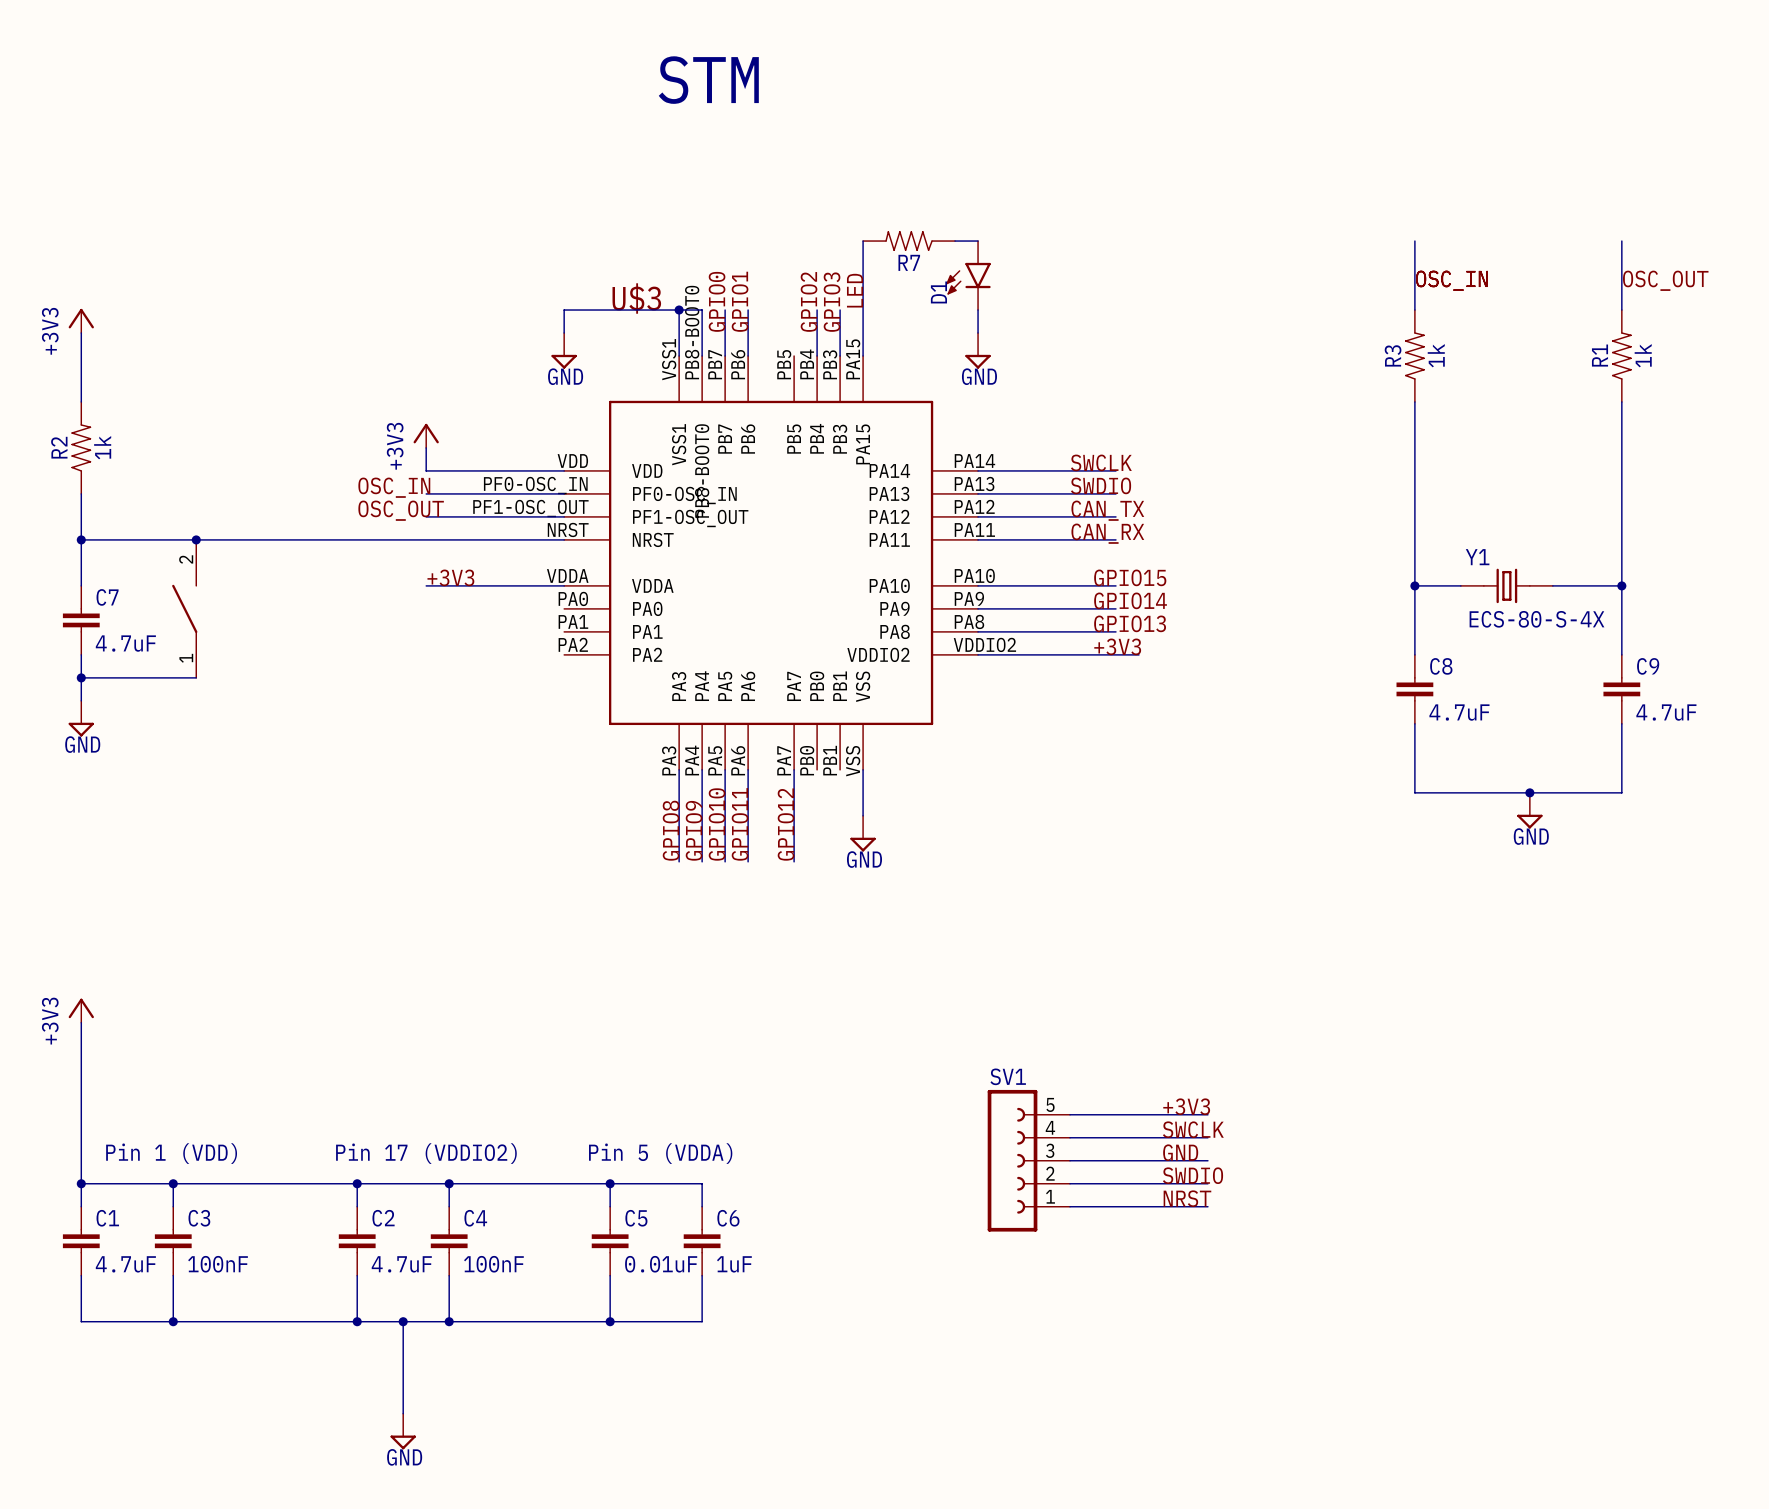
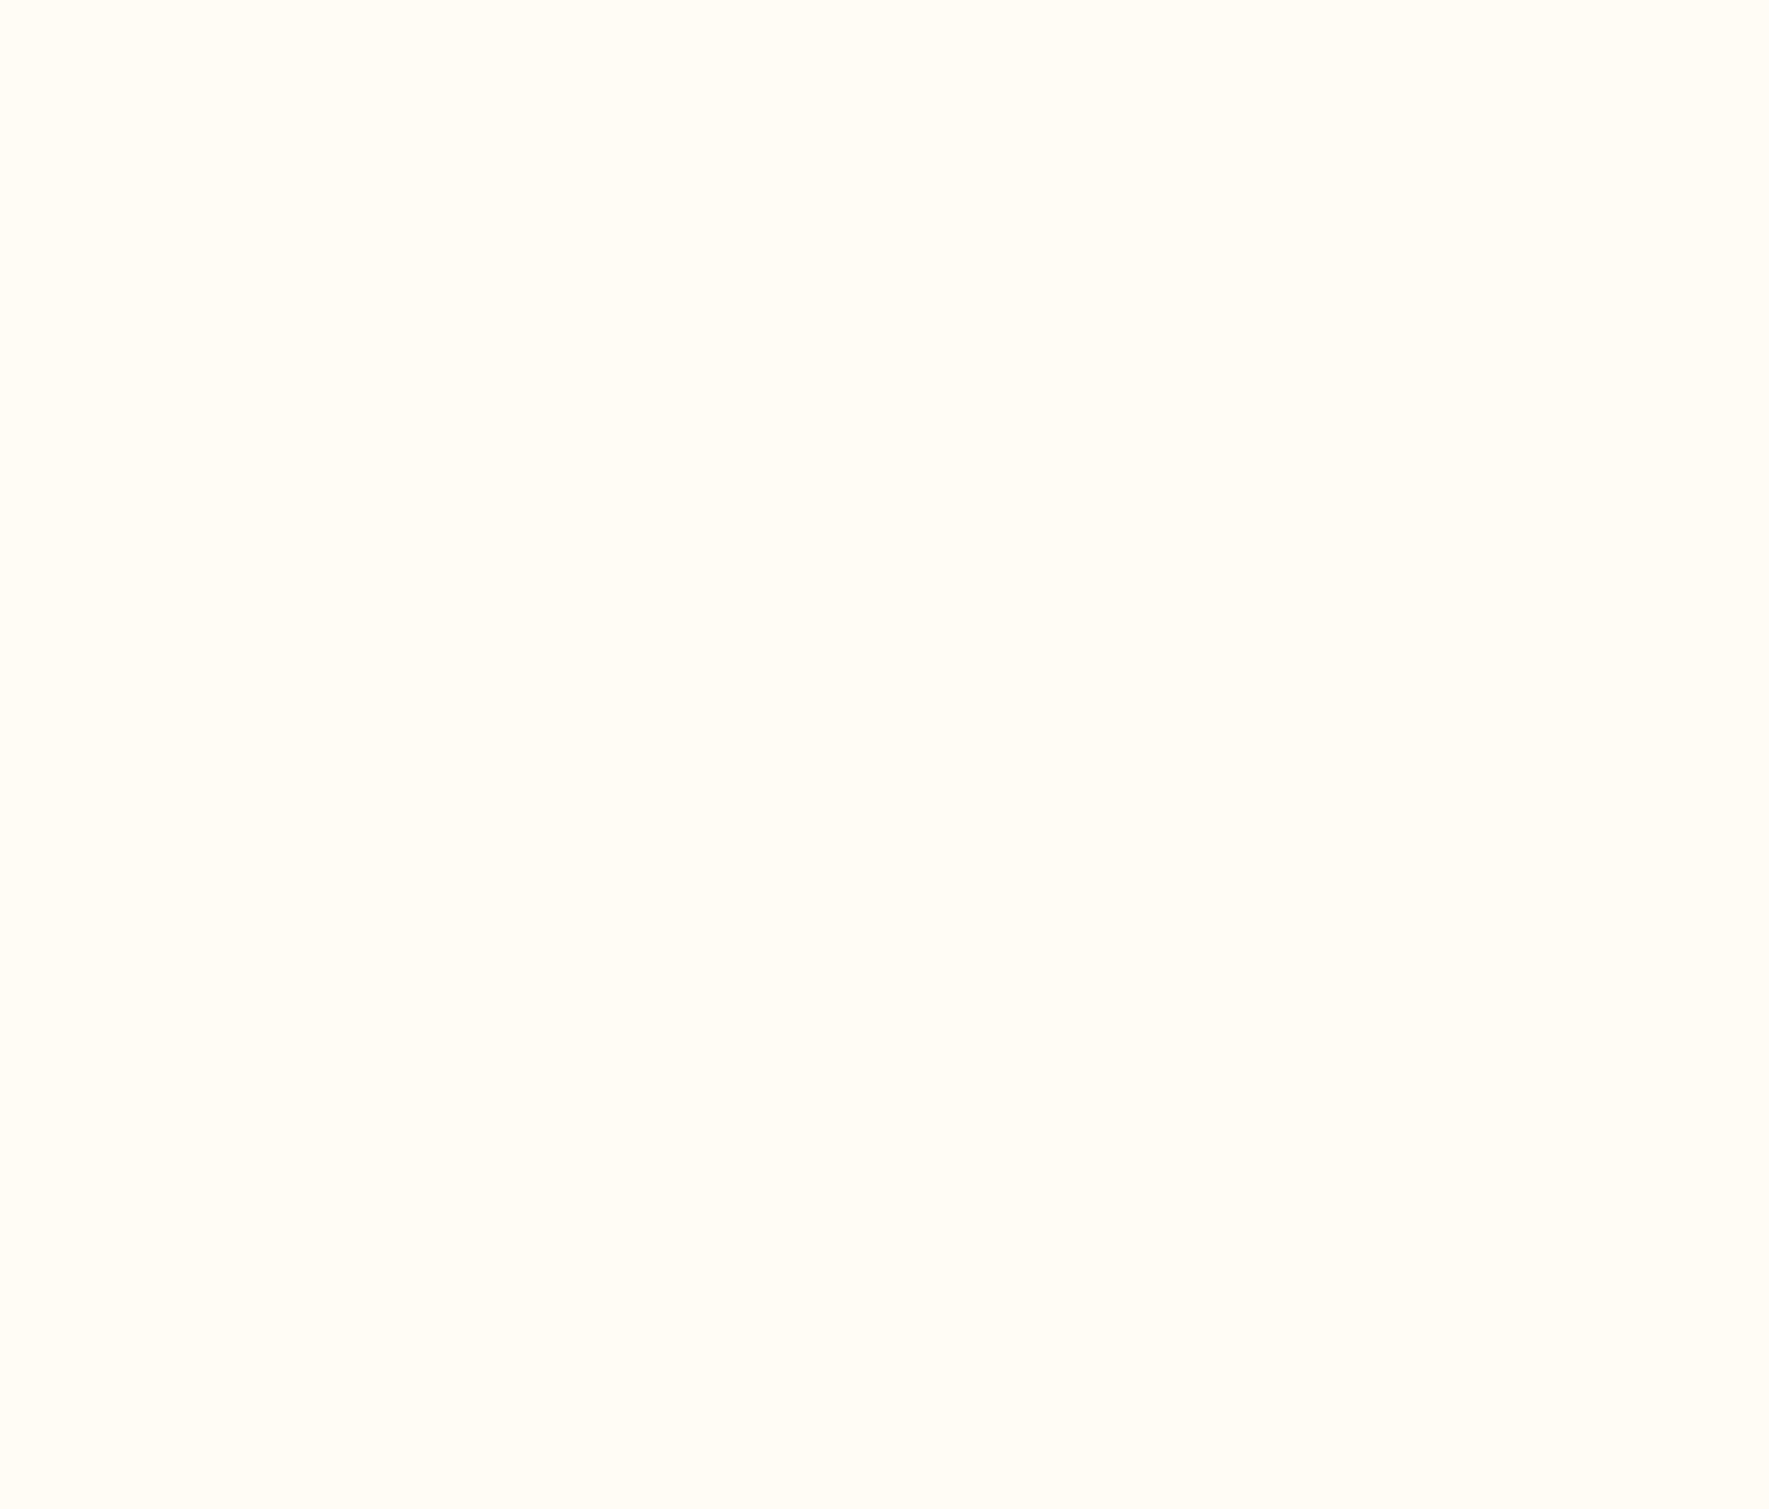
text: STM (708, 80) -> none
wire: (863, 241) (863, 355) -> none
R7: (909, 241) -> none
wire: (955, 241) (978, 241) -> none
wire: (1414, 241) (1414, 310) -> none
wire: (1621, 241) (1621, 310) -> none
D1: (968, 275) -> none
label: OSC_IN (1452, 280) -> none
label: OSC_OUT (1665, 280) -> none
label: LED (855, 290) -> none
label: GPIO0 (717, 301) -> none
label: GPIO1 (740, 301) -> none
label: GPIO2 (809, 301) -> none
label: GPIO3 (832, 302) -> none
wire: (679, 310) (679, 355) -> none
junction: (679, 310) -> none
wire: (725, 310) (725, 355) -> none
wire: (748, 310) (748, 355) -> none
wire: (817, 310) (817, 355) -> none
wire: (840, 310) (840, 355) -> none
wire: (978, 310) (978, 333) -> none
power symbol: +3V3 (81, 320) -> none
wire: (81, 333) (81, 401) -> none
wire: (564, 333) (564, 310) (702, 310) (702, 355) -> none
power symbol: GND (564, 350) -> none
power symbol: GND (978, 350) -> none
R3: 1k (1414, 355) -> none
R1: 1k (1621, 355) -> none
wire: (1414, 401) (1414, 654) -> none
wire: (1621, 401) (1621, 654) -> none
power symbol: +3V3 (426, 435) -> none
R2: 1k (81, 447) -> none
wire: (426, 447) (426, 470) (564, 470) -> none
label: SWCLK (1101, 462) -> none
wire: (978, 470) (1115, 470) -> none
label: SWDIO (1101, 485) -> none
label: OSC_IN (394, 487) -> none
wire: (81, 493) (81, 585) -> none
wire: (426, 493) (564, 493) -> none
wire: (978, 493) (1115, 493) -> none
label: OSC_OUT (401, 510) -> none
label: CAN_TX (1107, 510) -> none
wire: (426, 516) (564, 516) -> none
wire: (978, 516) (1115, 516) -> none
label: CAN_RX (1107, 533) -> none
wire: (81, 539) (564, 539) -> none
junction: (81, 539) -> none
junction: (196, 539) -> none
wire: (978, 539) (1115, 539) -> none
U$3: (771, 562) -> none
label: +3V3 (450, 577) -> none
label: GPIO15 (1130, 577) -> none
wire: (426, 585) (564, 585) -> none
wire: (978, 585) (1115, 585) -> none
wire: (1414, 585) (1460, 585) -> none
junction: (1414, 585) -> none
Y1: ECS-80-S-4X (1506, 585) -> none
wire: (1552, 585) (1621, 585) -> none
junction: (1621, 585) -> none
label: GPIO14 (1130, 600) -> none
part: (184, 608) -> none
wire: (978, 608) (1115, 608) -> none
C7: 4.7uF (81, 620) -> none
label: GPIO13 (1130, 623) -> none
wire: (978, 631) (1115, 631) -> none
label: +3V3 (1117, 646) -> none
wire: (81, 654) (81, 700) -> none
wire: (978, 654) (1138, 654) -> none
wire: (81, 677) (196, 677) -> none
junction: (81, 677) -> none
C8: 4.7uF (1414, 689) -> none
C9: 4.7uF (1621, 689) -> none
power symbol: GND (81, 718) -> none
wire: (1414, 723) (1414, 792) (1621, 792) (1621, 723) -> none
wire: (679, 769) (679, 861) -> none
wire: (702, 769) (702, 861) -> none
wire: (725, 769) (725, 861) -> none
wire: (748, 769) (748, 861) -> none
wire: (794, 769) (794, 861) -> none
wire: (863, 769) (863, 815) -> none
junction: (1529, 792) -> none
power symbol: GND (1529, 810) -> none
label: GPIO10 (717, 824) -> none
label: GPIO11 (740, 824) -> none
label: GPIO12 (786, 824) -> none
label: GPIO8 (671, 830) -> none
label: GPIO9 (694, 830) -> none
power symbol: GND (863, 833) -> none
power symbol: +3V3 (81, 1010) -> none
wire: (81, 1022) (81, 1206) -> none
label: +3V3 (1186, 1106) -> none
wire: (1070, 1114) (1207, 1114) -> none
label: SWCLK (1193, 1129) -> none
wire: (1070, 1137) (1207, 1137) -> none
label: GND (1180, 1152) -> none
text: Pin 1 (VDD) (171, 1153) -> none
text: Pin 17 (VDDIO2) (426, 1153) -> none
text: Pin 5 (VDDA) (660, 1153) -> none
SV1: (1028, 1160) -> none
wire: (1070, 1160) (1207, 1160) -> none
label: SWDIO (1192, 1175) -> none
wire: (81, 1183) (702, 1183) (702, 1206) -> none
junction: (81, 1183) -> none
wire: (173, 1183) (173, 1206) -> none
junction: (173, 1183) -> none
wire: (357, 1183) (357, 1206) -> none
junction: (357, 1183) -> none
wire: (449, 1183) (449, 1206) -> none
junction: (449, 1183) -> none
wire: (610, 1183) (610, 1206) -> none
junction: (610, 1183) -> none
wire: (1070, 1183) (1207, 1183) -> none
label: NRST (1187, 1198) -> none
wire: (1070, 1206) (1207, 1206) -> none
C1: 4.7uF (81, 1241) -> none
C3: 100nF (173, 1241) -> none
C2: 4.7uF (357, 1241) -> none
C4: 100nF (449, 1241) -> none
C5: 0.01uF (610, 1241) -> none
C6: 1uF (702, 1241) -> none
wire: (81, 1275) (81, 1321) (702, 1321) (702, 1275) -> none
wire: (173, 1275) (173, 1321) -> none
wire: (357, 1275) (357, 1321) -> none
wire: (449, 1275) (449, 1321) -> none
wire: (610, 1275) (610, 1321) -> none
junction: (173, 1321) -> none
junction: (357, 1321) -> none
wire: (403, 1321) (403, 1413) -> none
junction: (403, 1321) -> none
junction: (449, 1321) -> none
junction: (610, 1321) -> none
power symbol: GND (403, 1431) -> none

